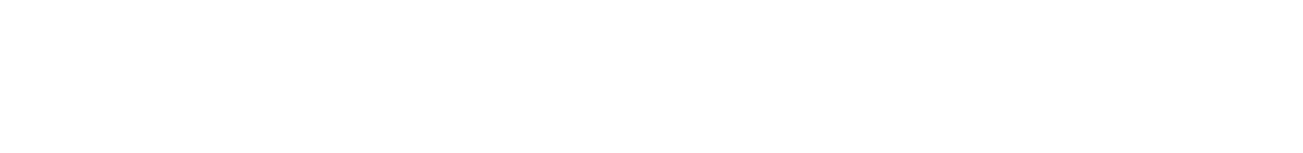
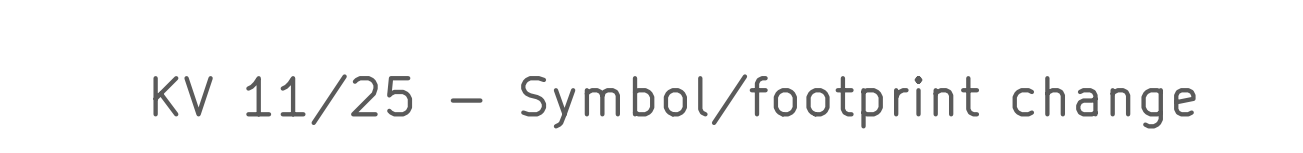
text: none -> KV 11/25 - Symbol/footprint change (674, 101)

